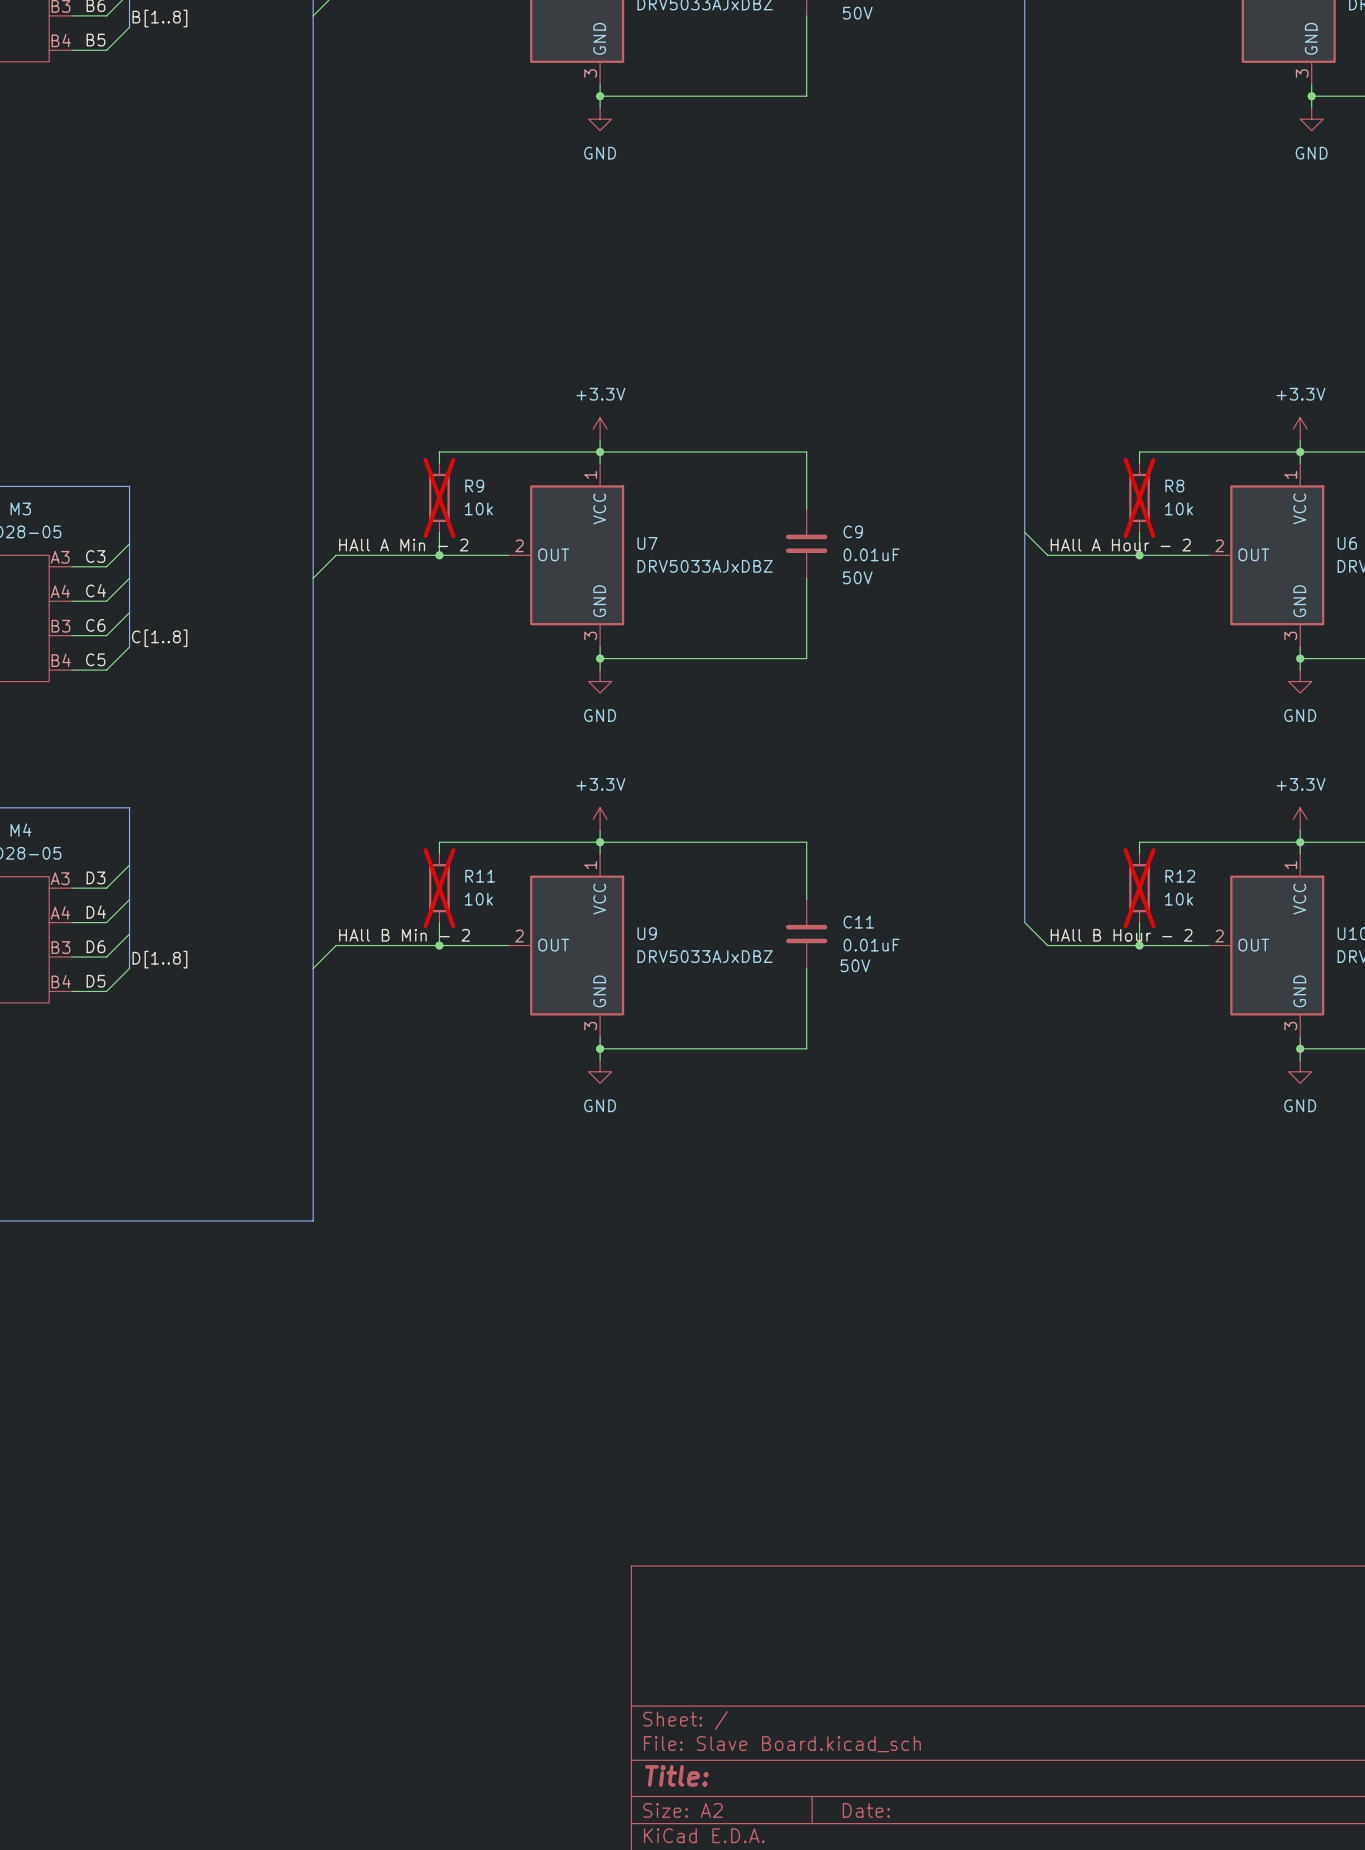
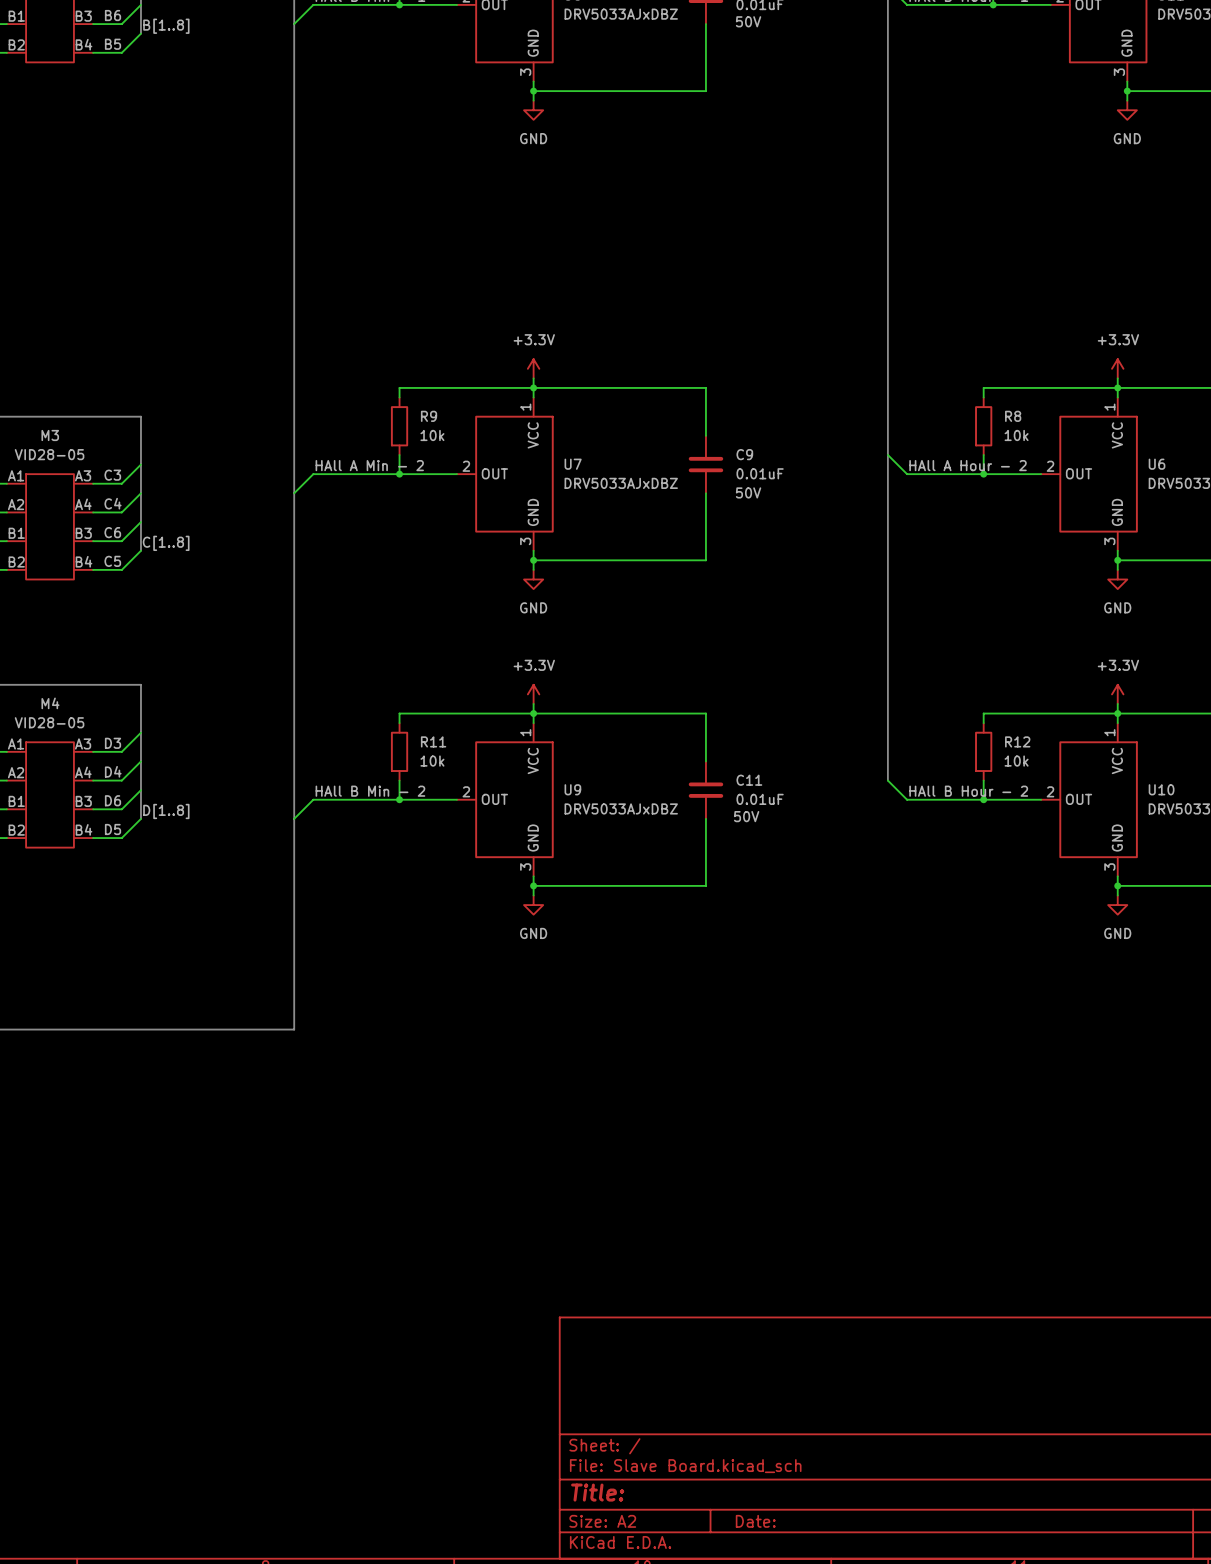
R9 do-not-place cross: (439, 497) -> none
R8 do-not-place cross: (1139, 497) -> none
R11 do-not-place cross: (439, 888) -> none
R12 do-not-place cross: (1139, 888) -> none

